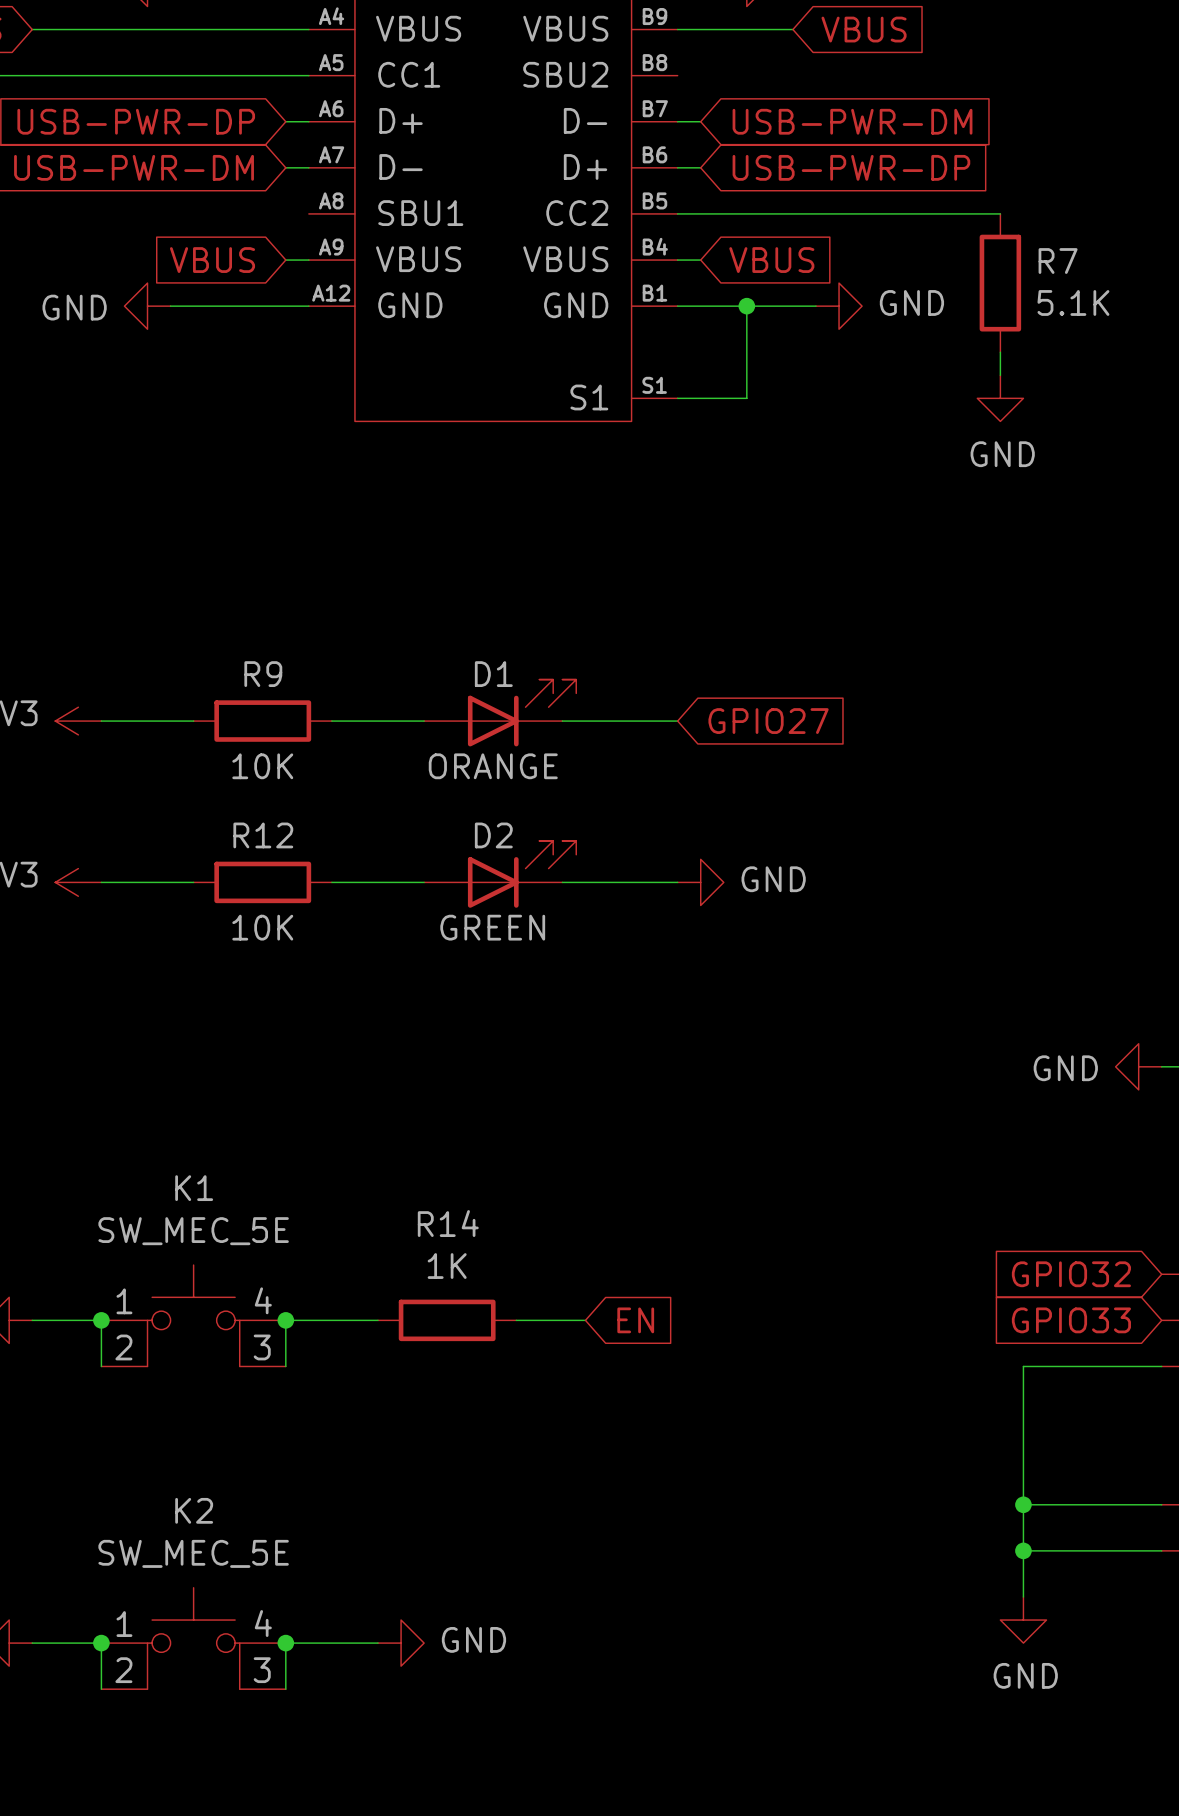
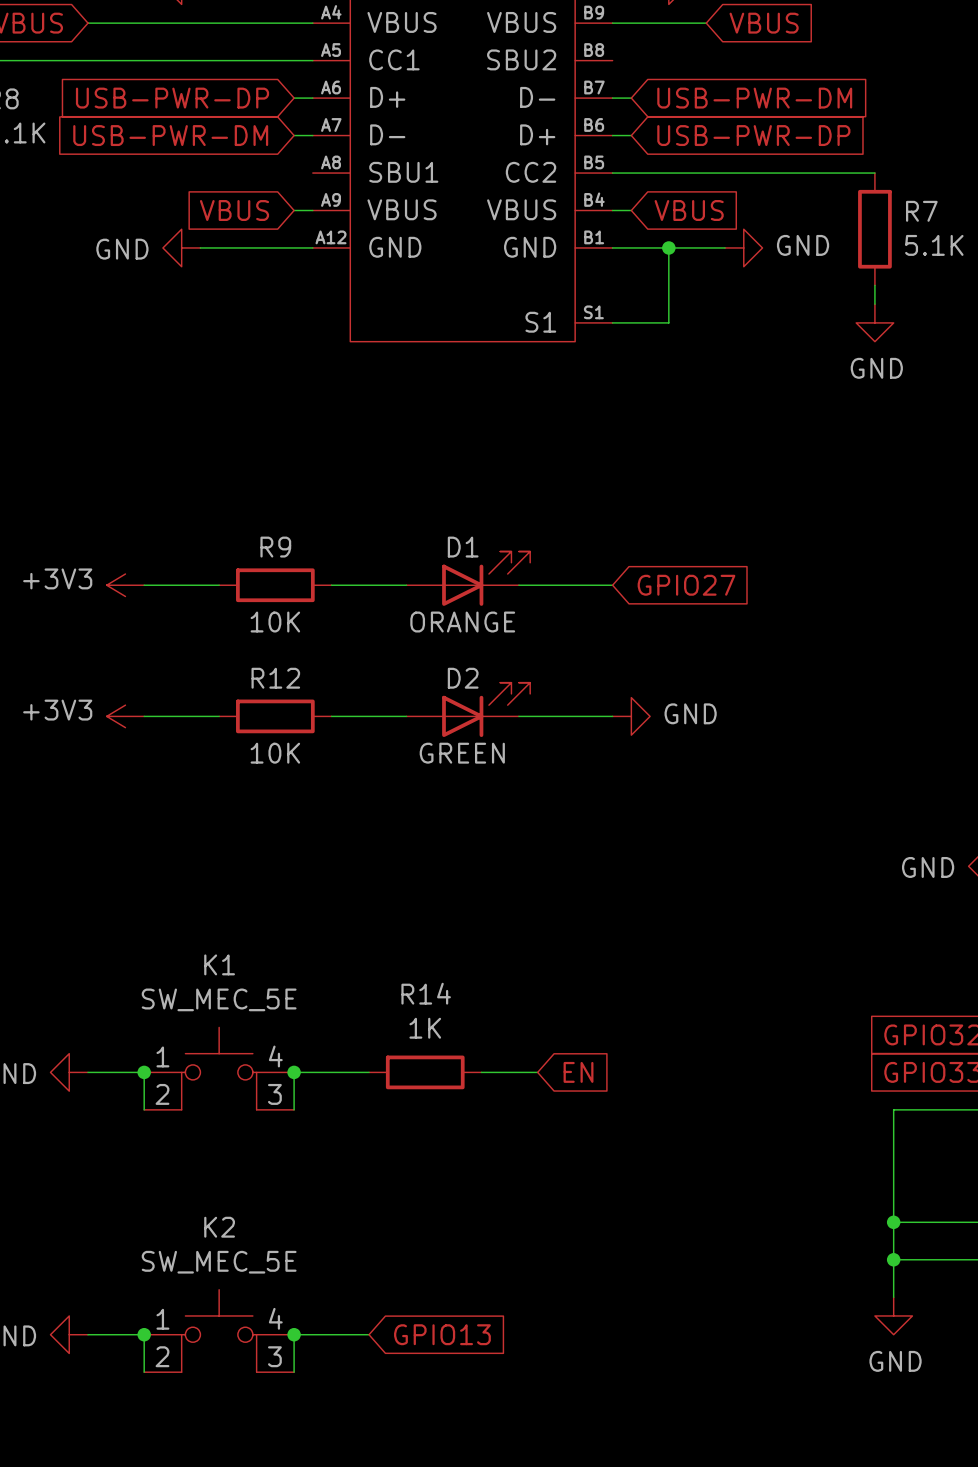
power symbol: GND (401, 1643) -> none
global label: none -> GPIO13 (442, 1334)

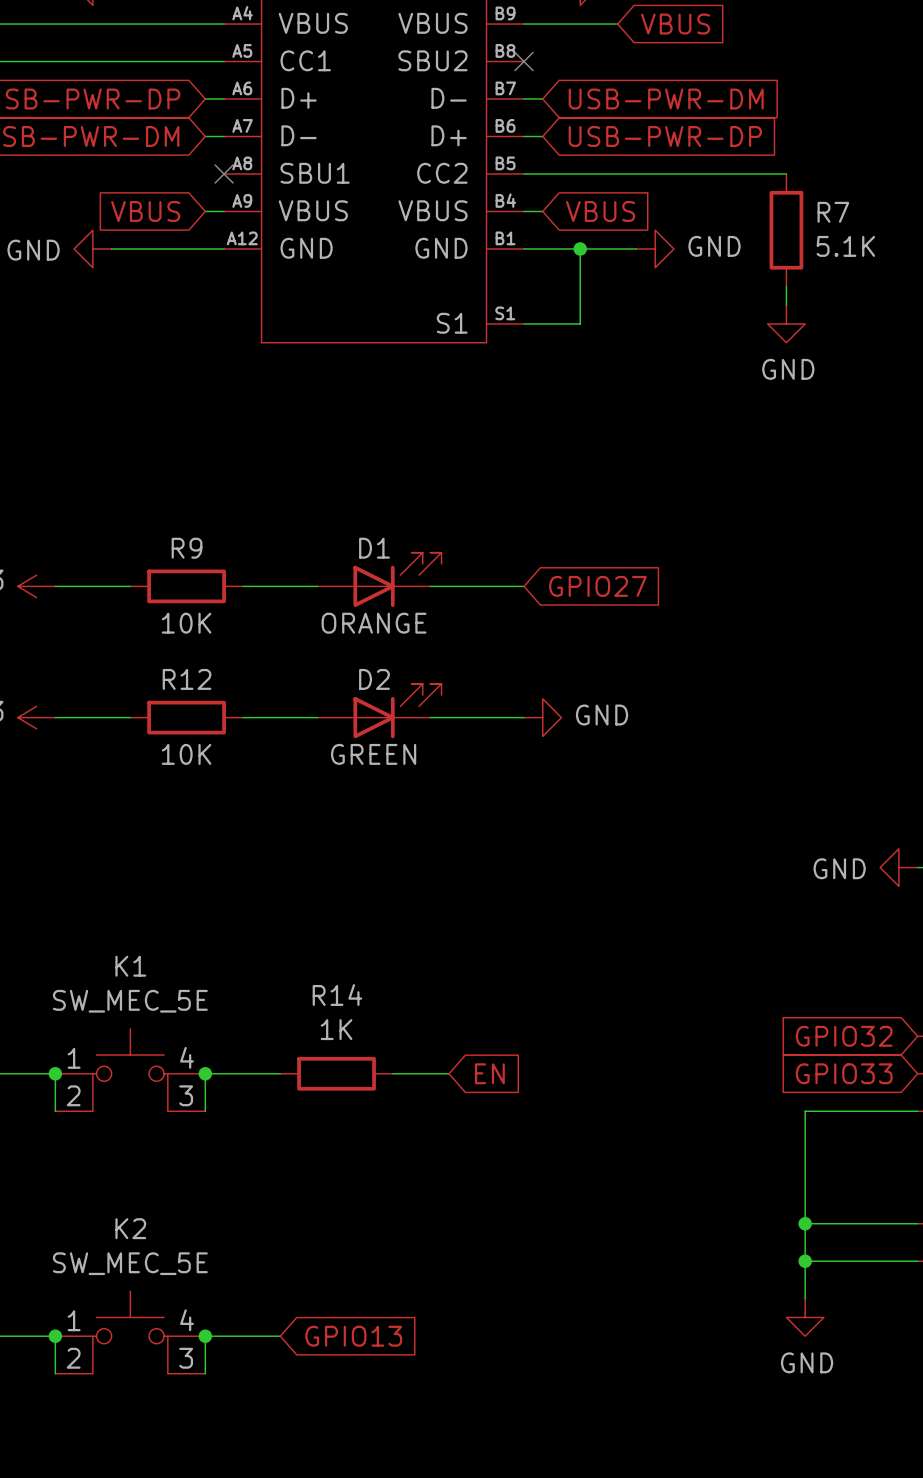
no-connect mark: none -> (524, 61)
no-connect mark: none -> (224, 173)

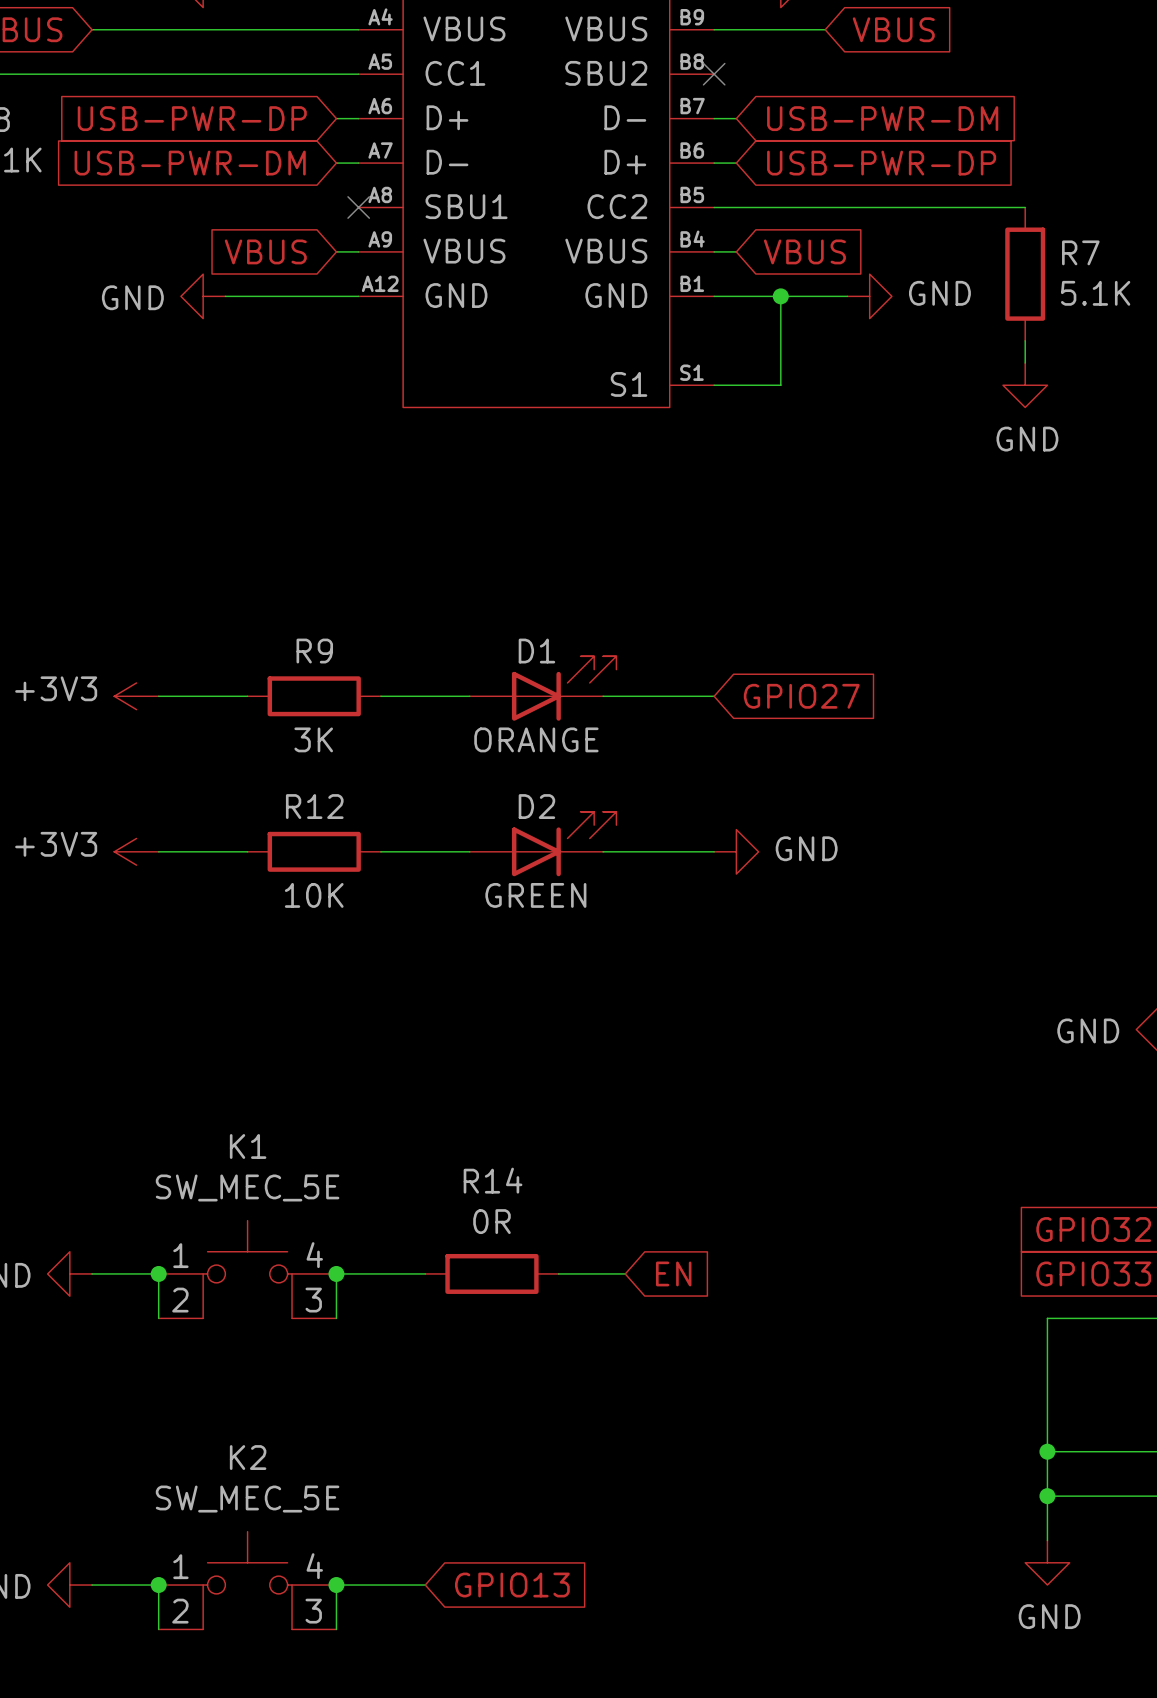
R9 value: 10K (186, 623) -> 3K (313, 739)
R14 value: 1K (336, 1029) -> 0R (491, 1221)

